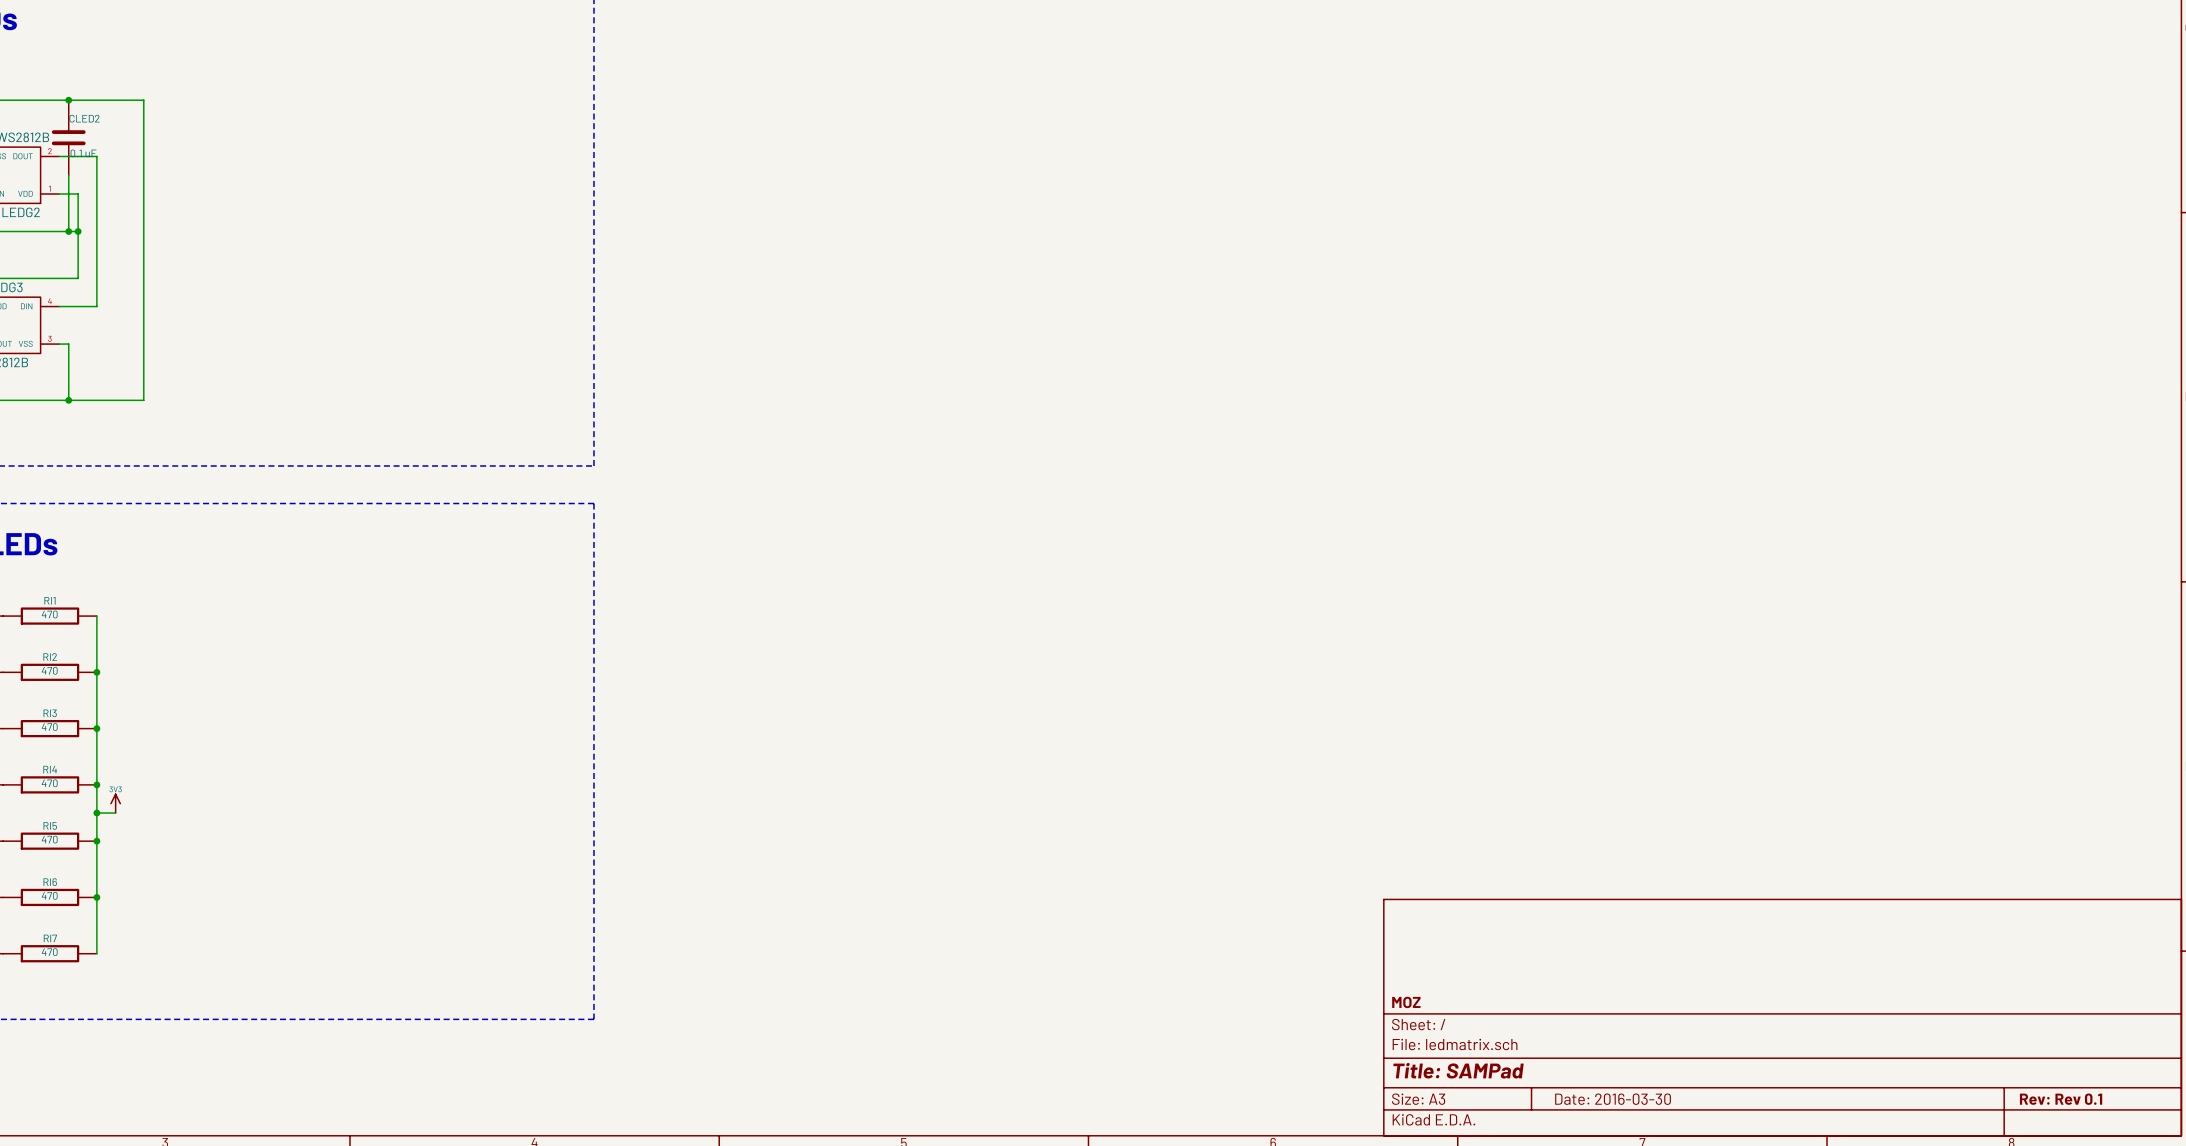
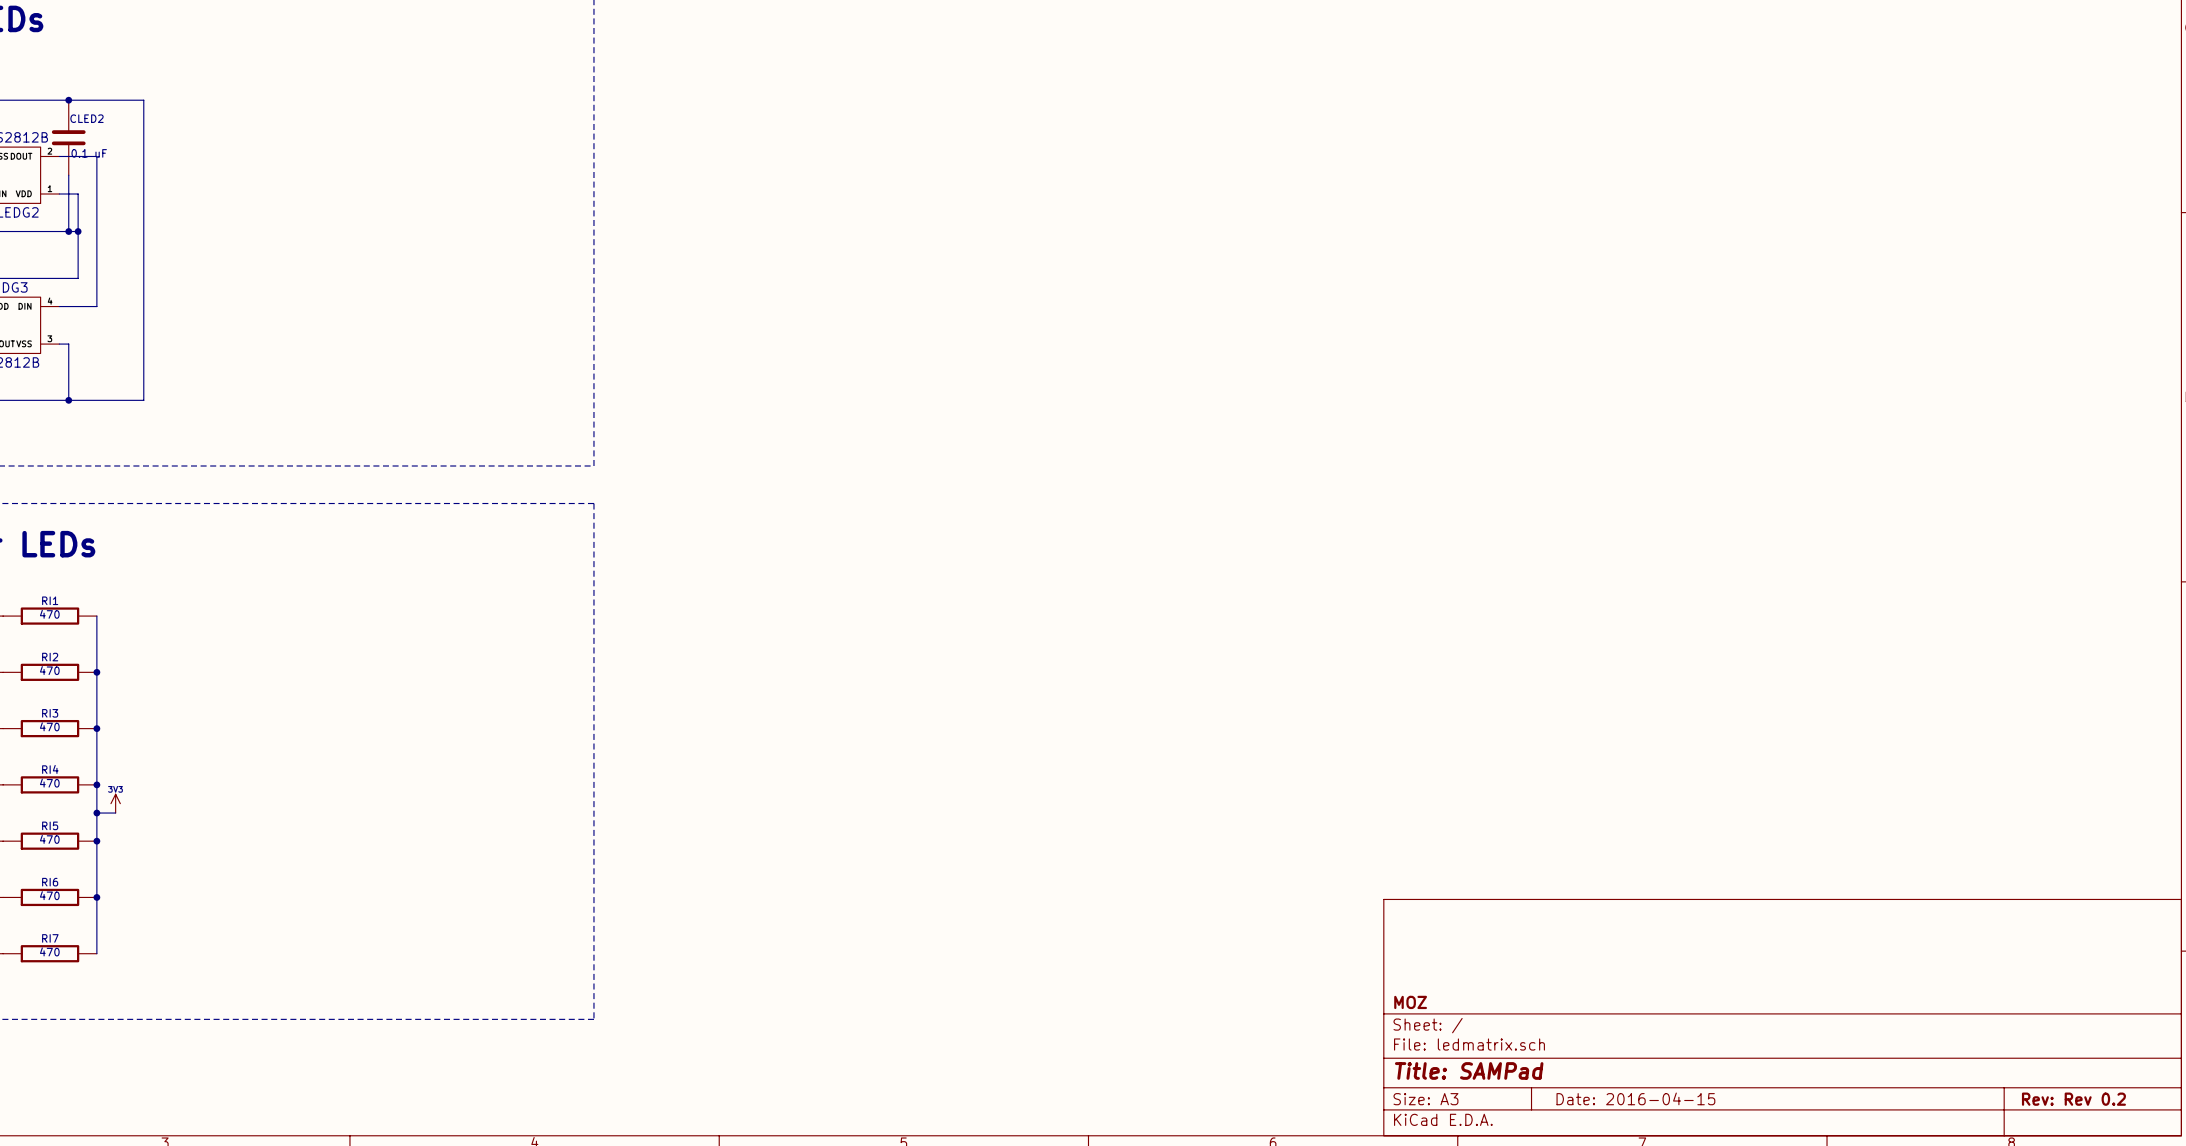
title block: Date: 2016-03-30 (1613, 1099) -> Date: 2016-04-15 (1635, 1098)
title block: Rev: Rev 0.1 (2061, 1099) -> Rev: Rev 0.2 (2073, 1099)

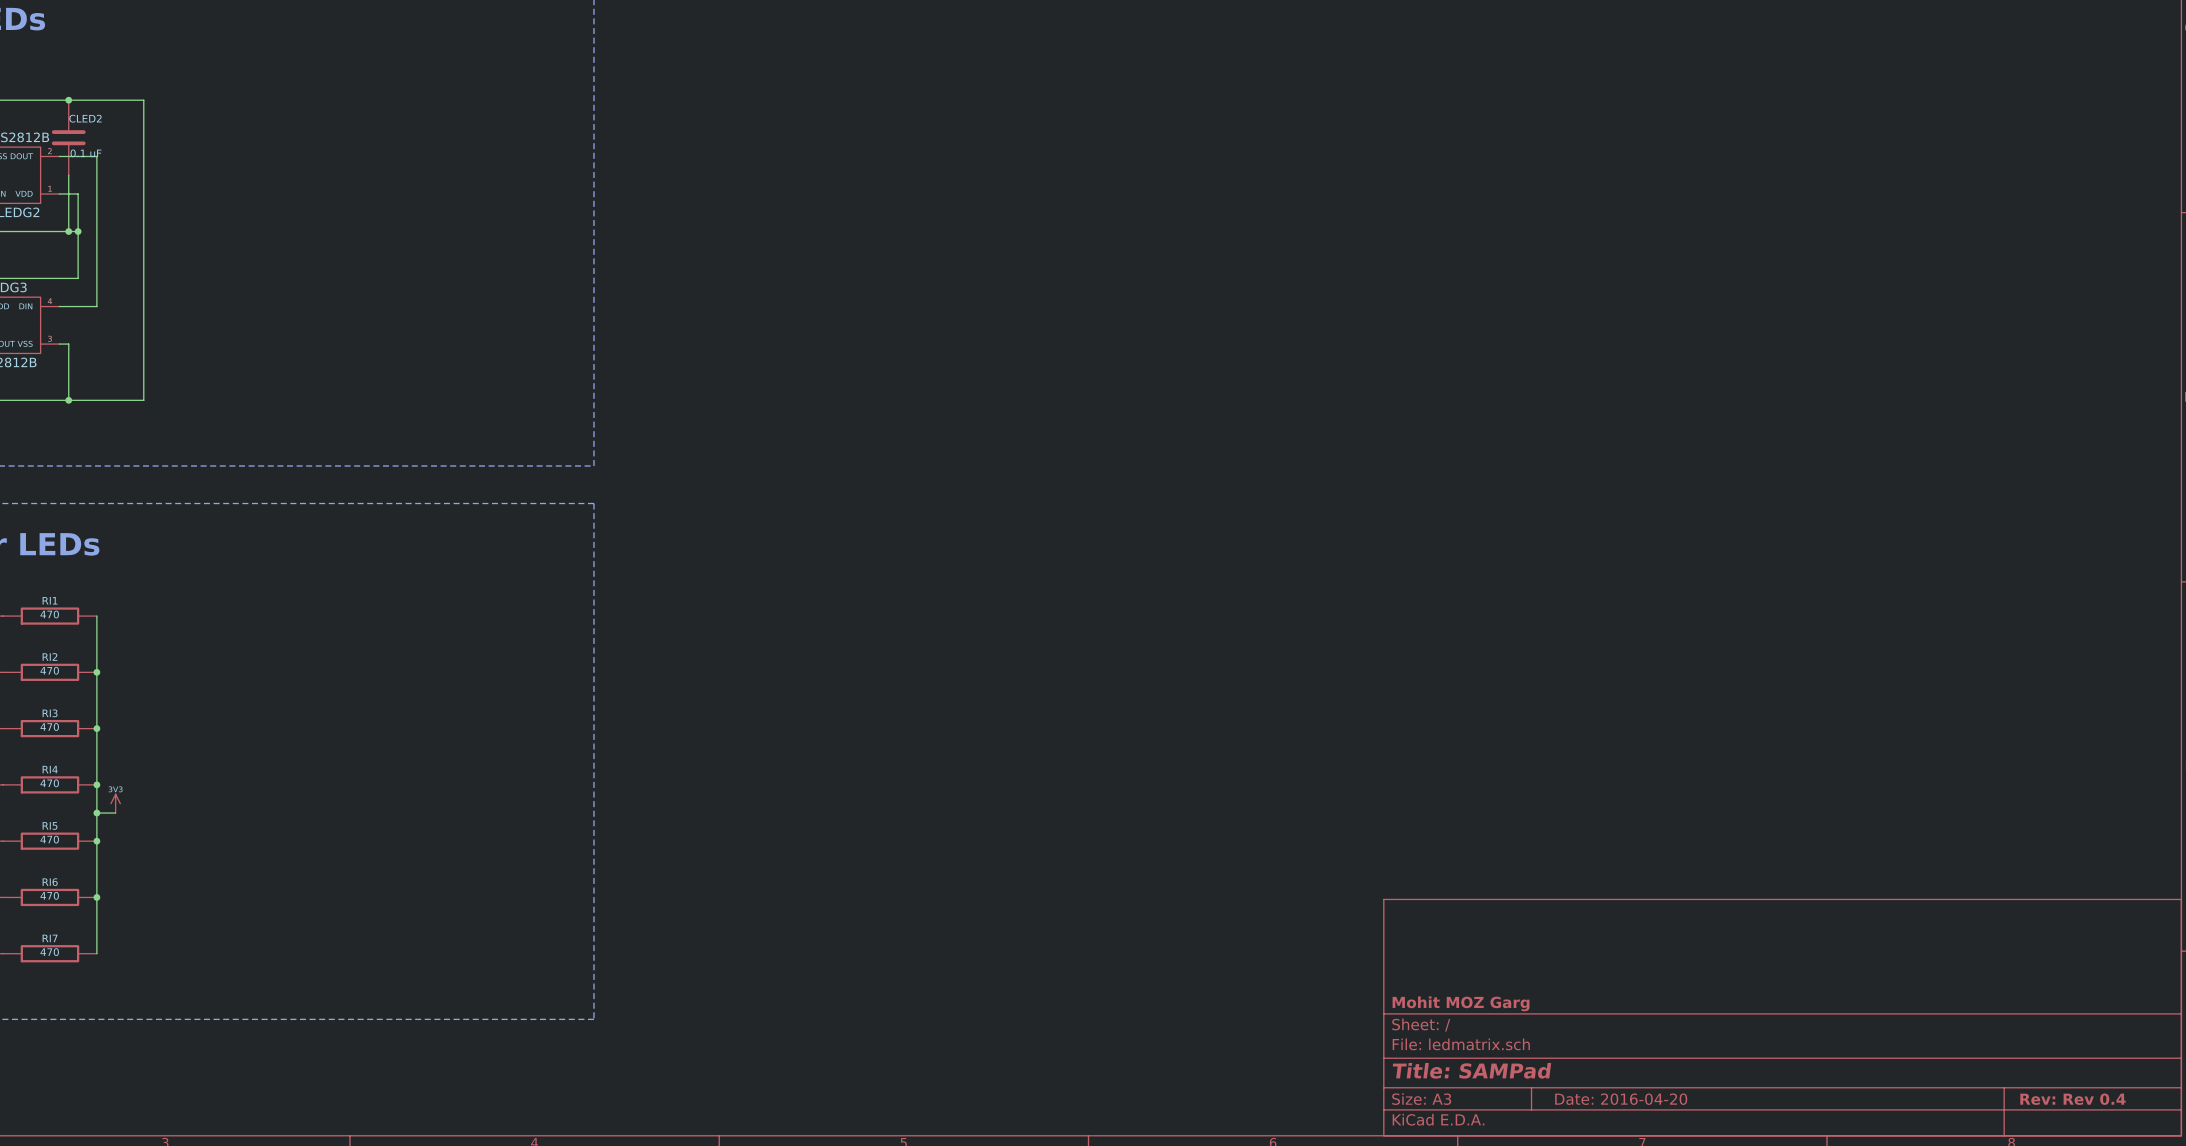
title block: MOZ (1410, 1002) -> Mohit MOZ Garg (1461, 1003)
title block: Date: 2016-04-15 (1635, 1098) -> Date: 2016-04-20 (1621, 1099)
title block: Rev: Rev 0.2 (2073, 1099) -> Rev: Rev 0.4 (2072, 1099)

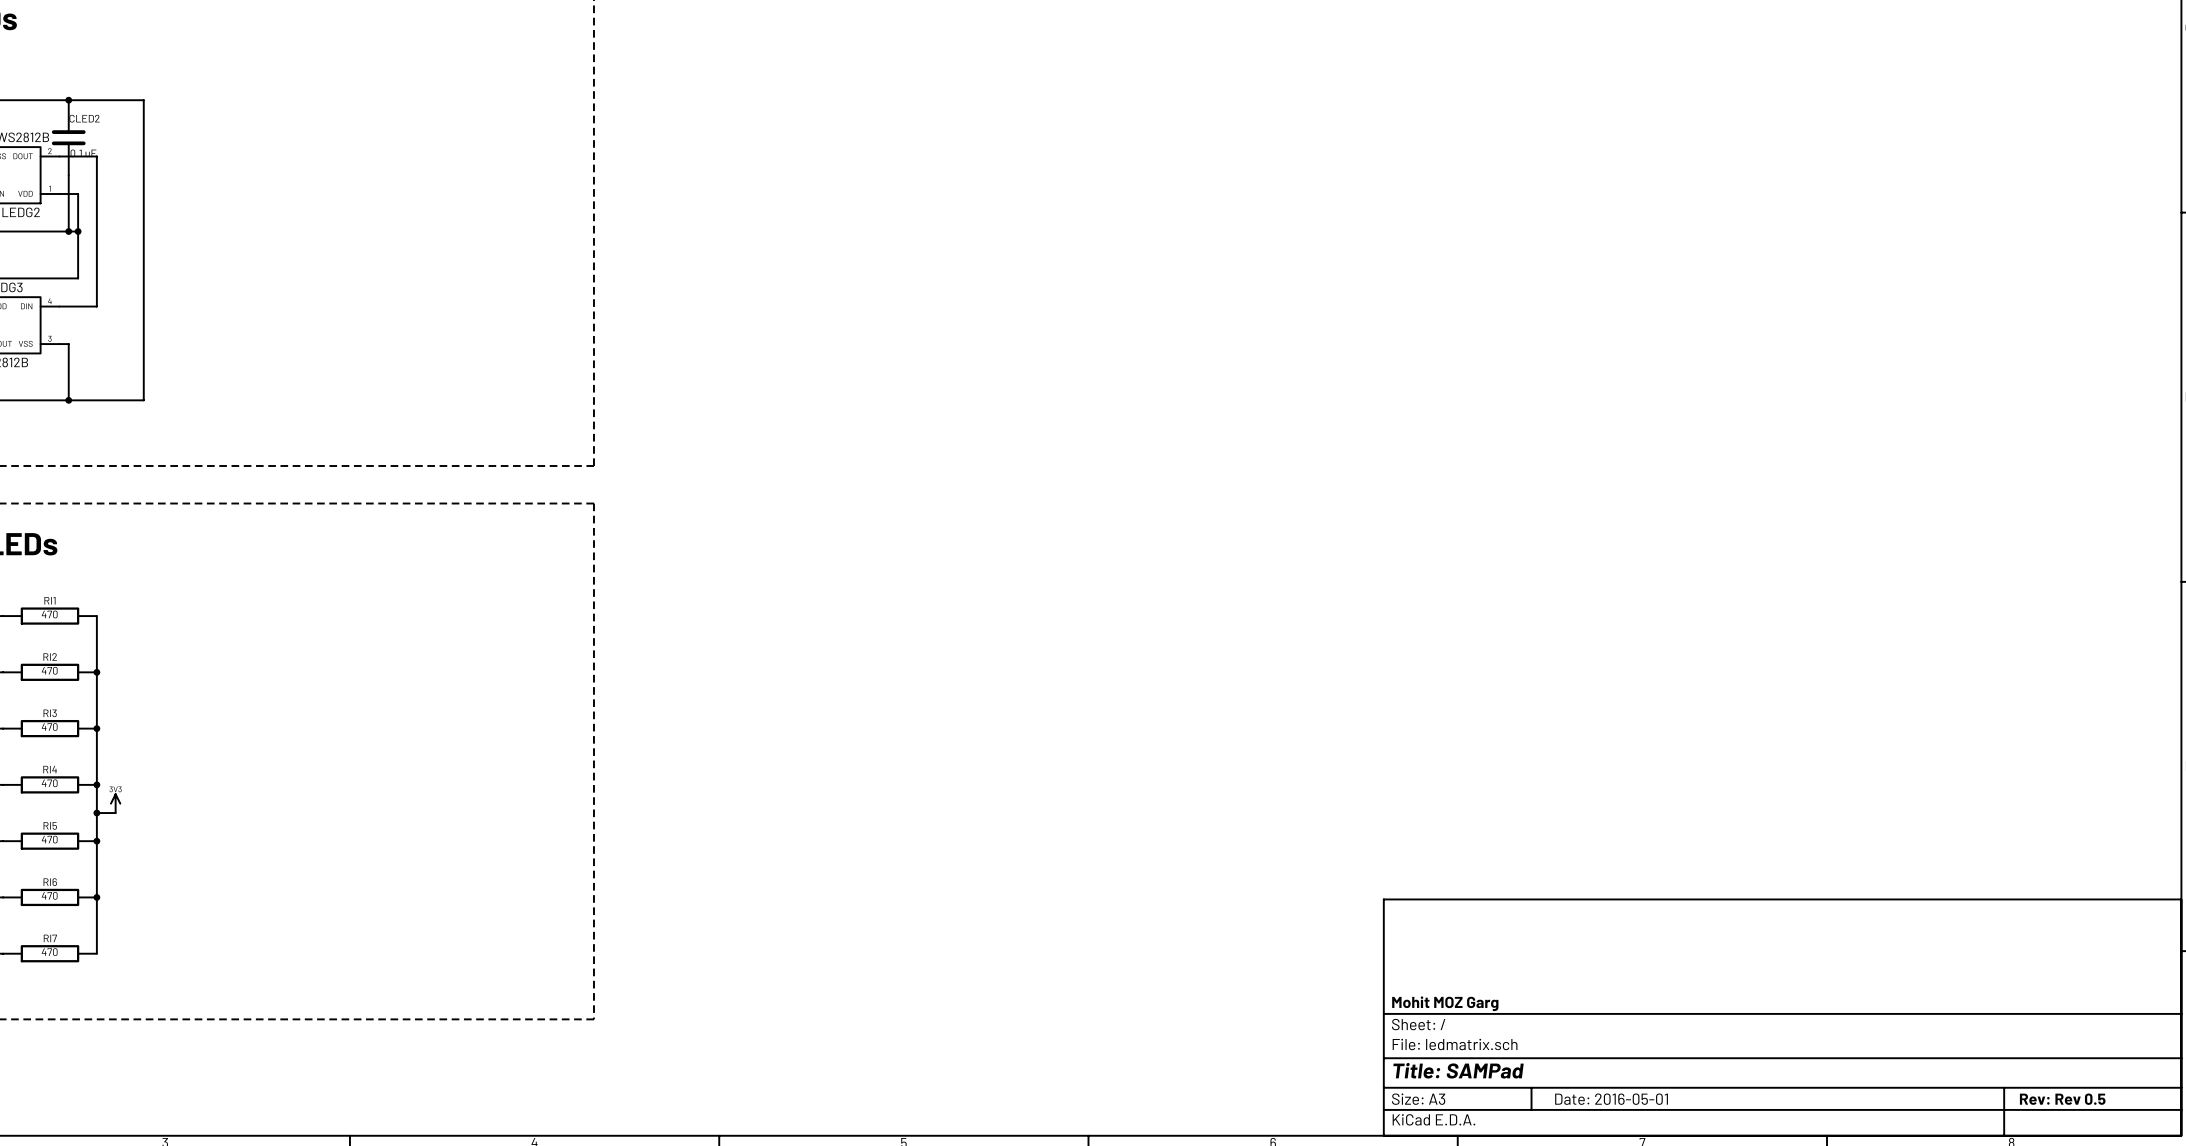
title block: Date: 2016-04-20 (1621, 1099) -> Date: 2016-05-01 (1611, 1099)
title block: Rev: Rev 0.4 (2072, 1099) -> Rev: Rev 0.5 (2062, 1099)

